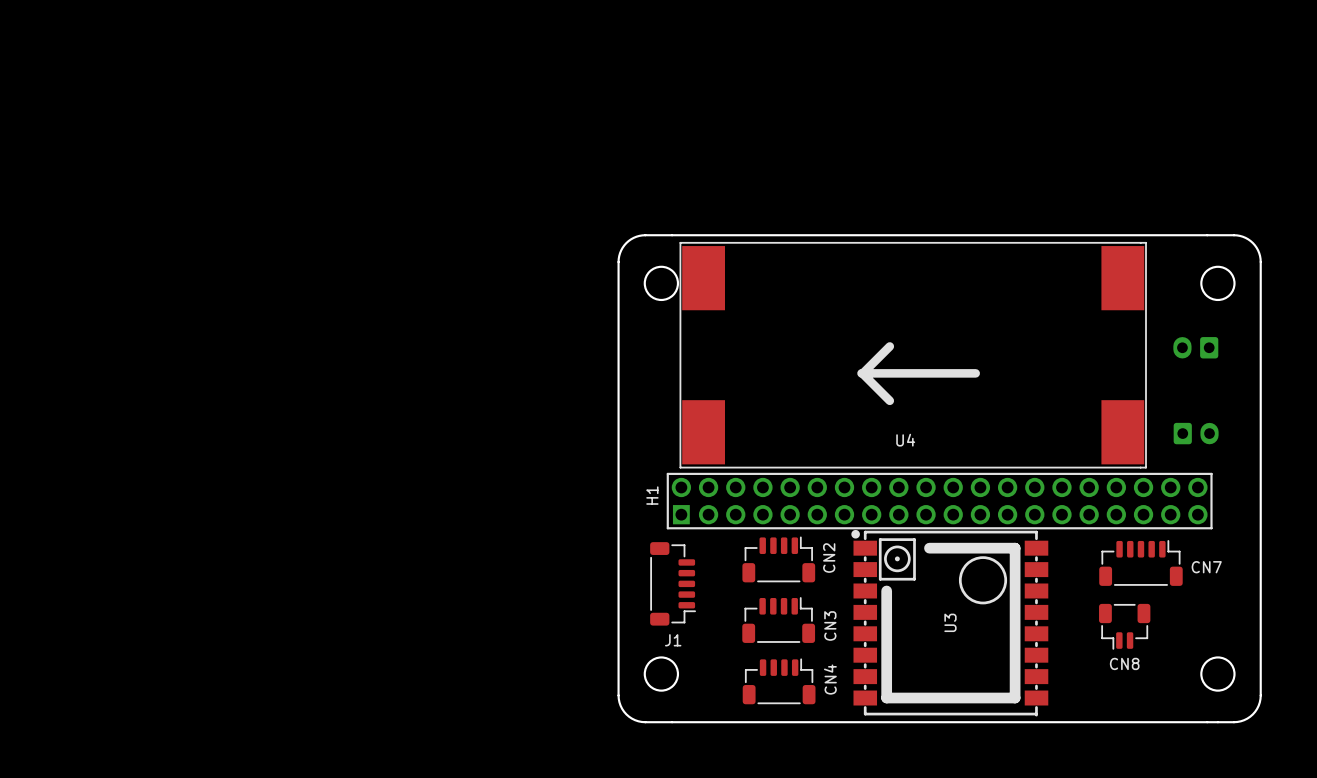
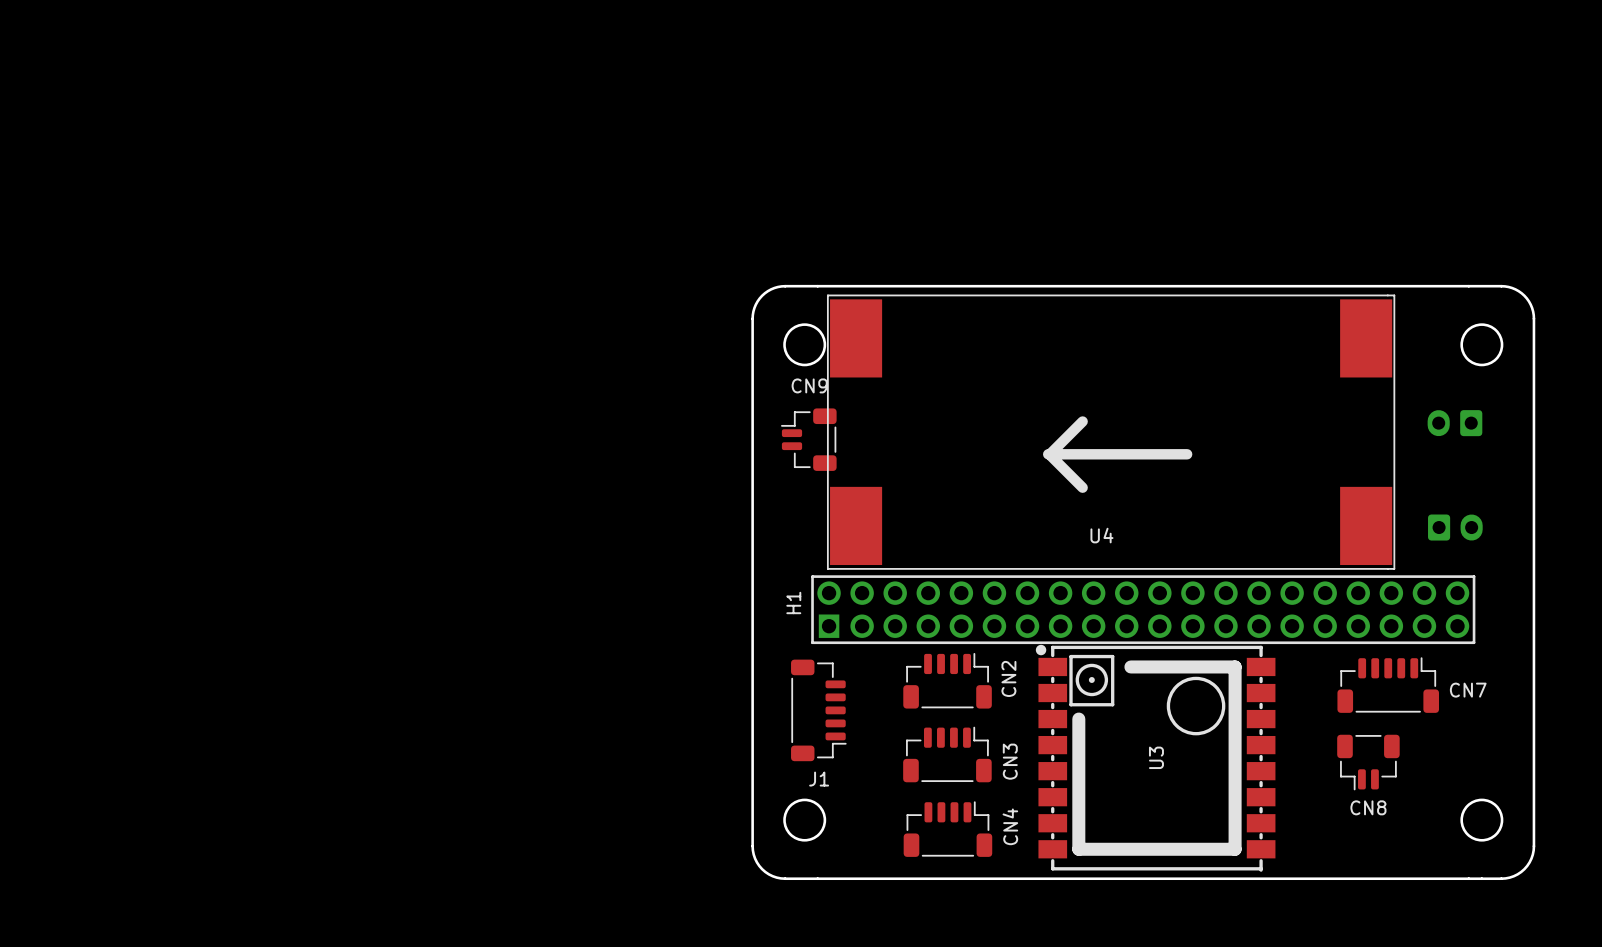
CN9: none -> (808, 439)

